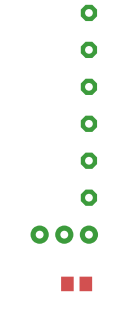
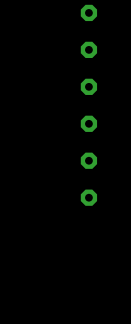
part: (64, 234) -> none
part: (76, 283) -> none

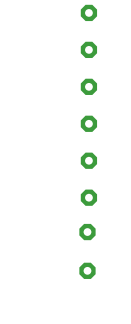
part: none -> (87, 232)
part: none -> (87, 270)

